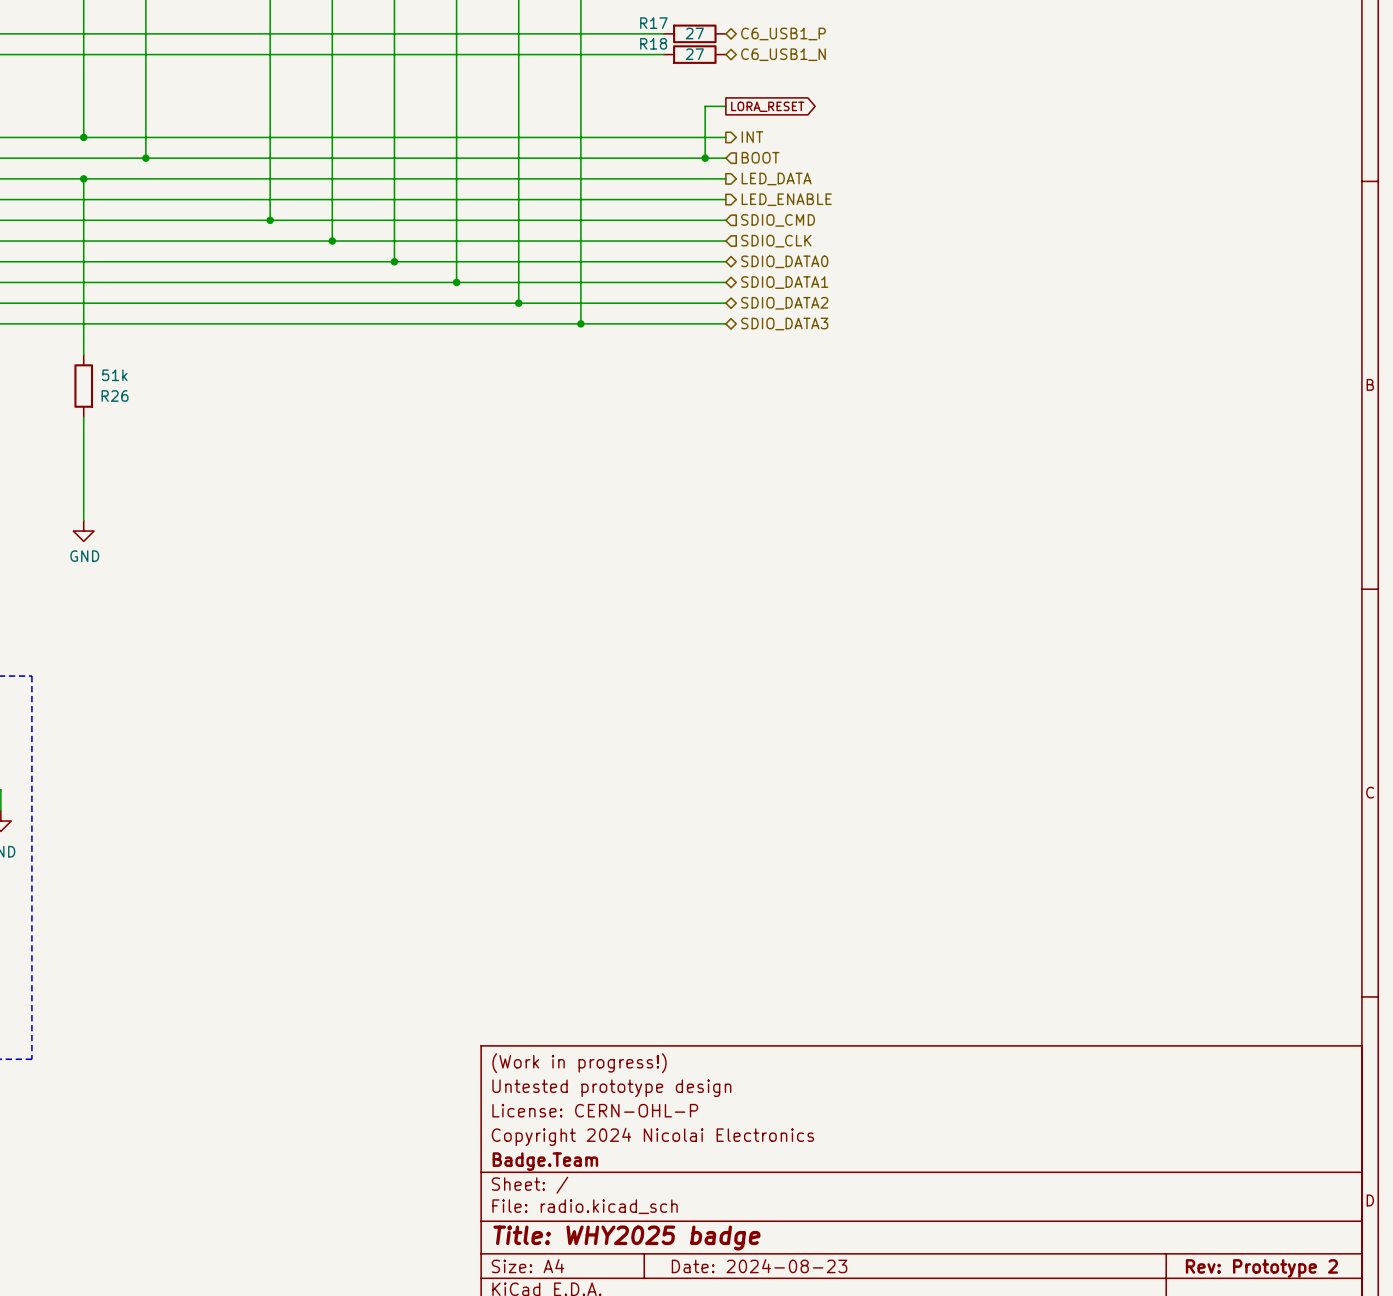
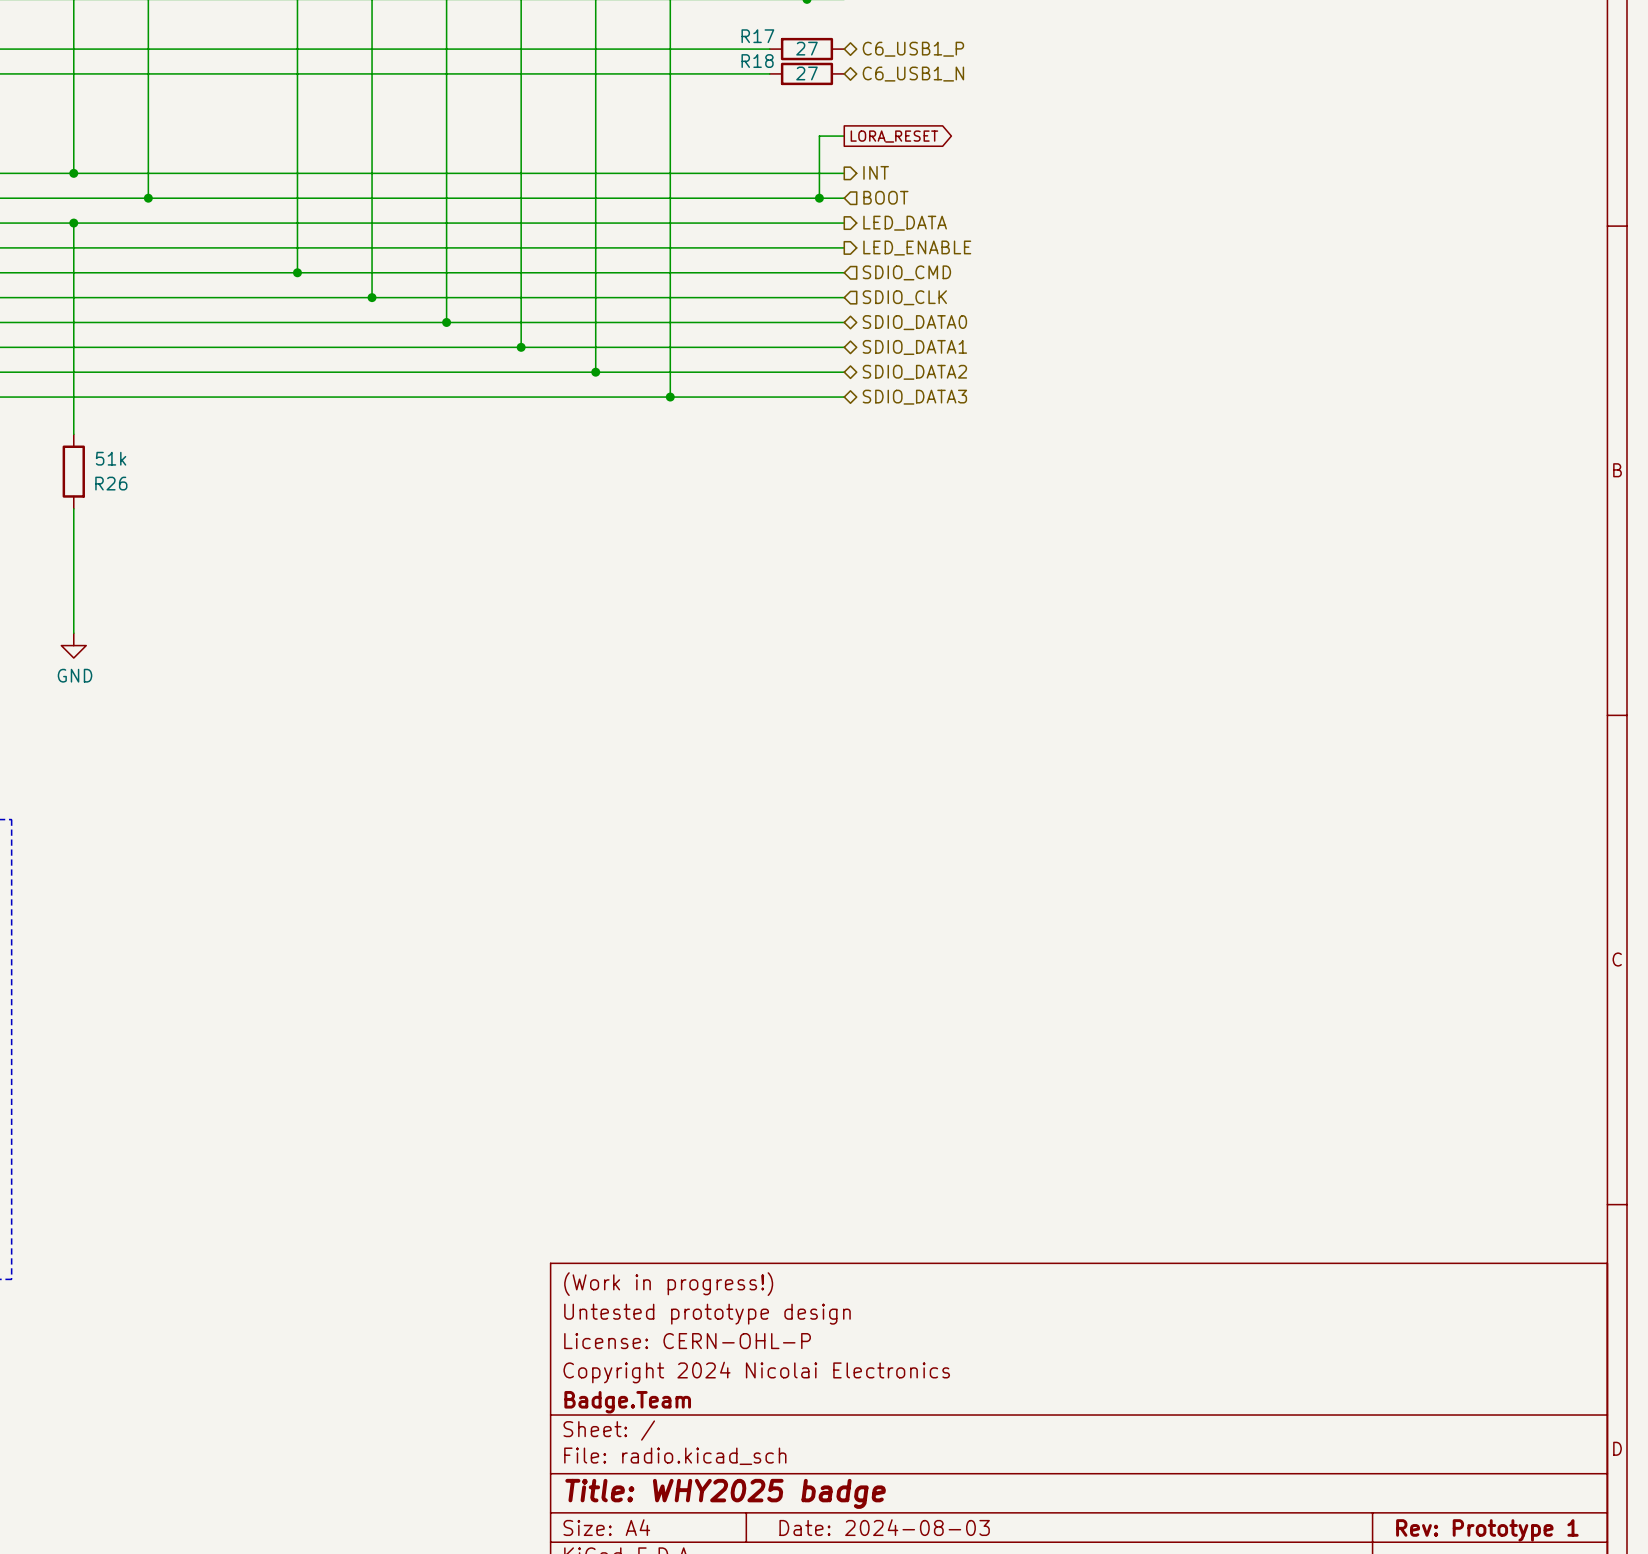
title block: Date: 2024-08-23 (759, 1266) -> Date: 2024-08-03 (884, 1527)
title block: Rev: Prototype 2 (1261, 1268) -> Rev: Prototype 1 (1487, 1530)

